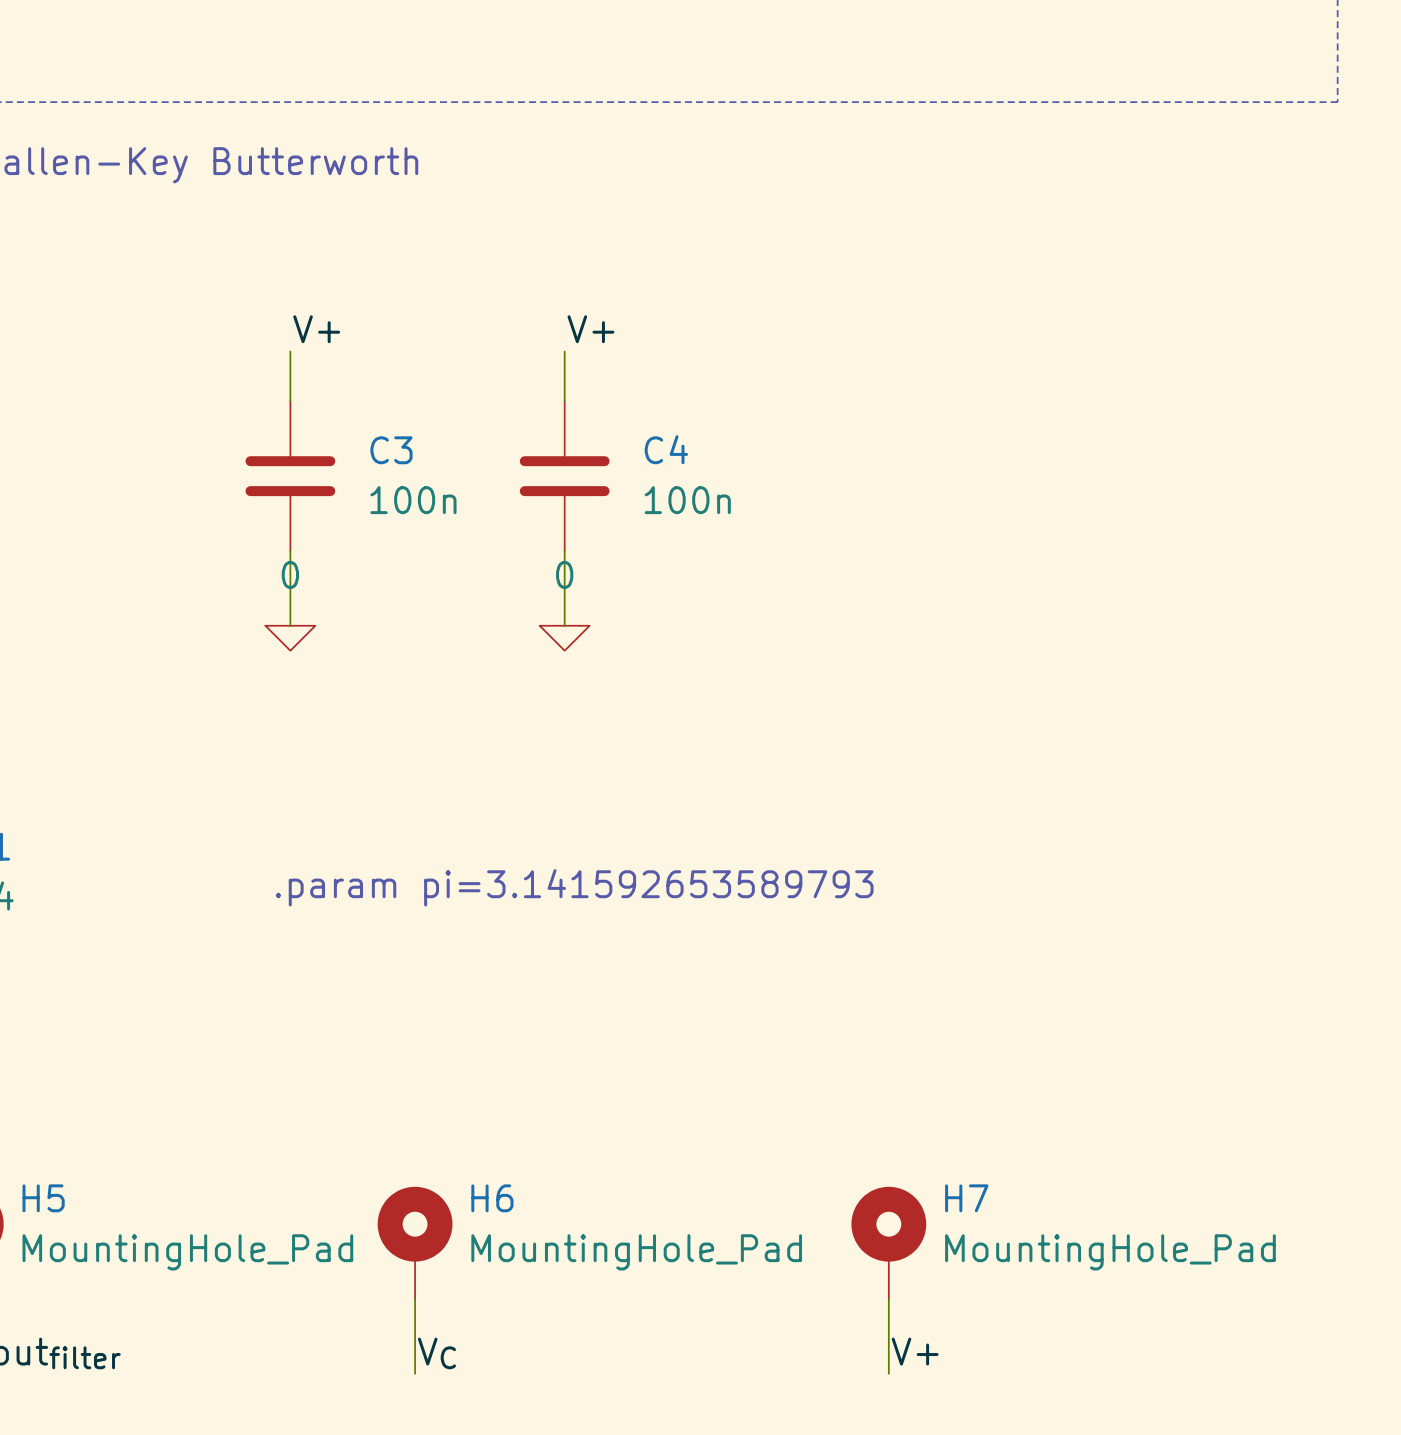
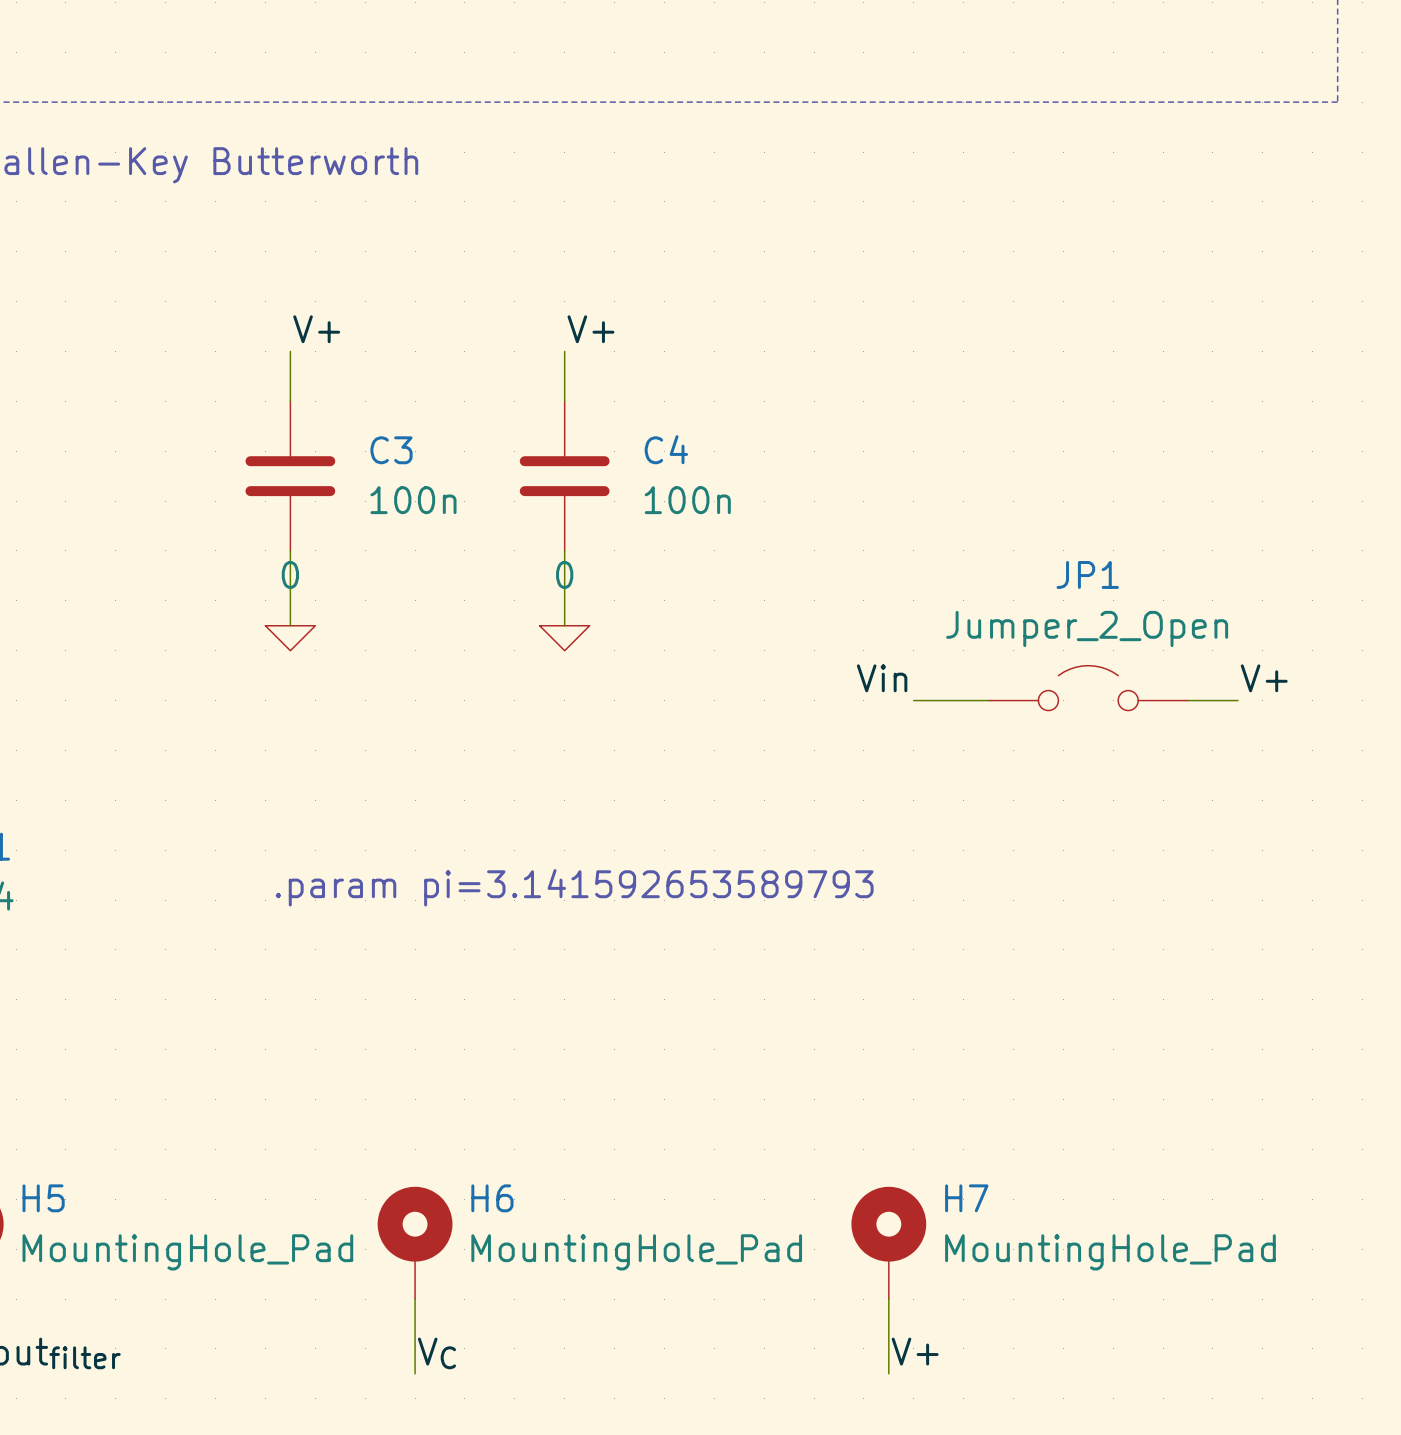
label: none -> Vin (882, 678)
label: none -> V+ (1264, 678)
JP1: none -> Jumper_2_Open (1088, 688)
wire: none -> (913, 700) (988, 700)
wire: none -> (1188, 700) (1237, 700)

